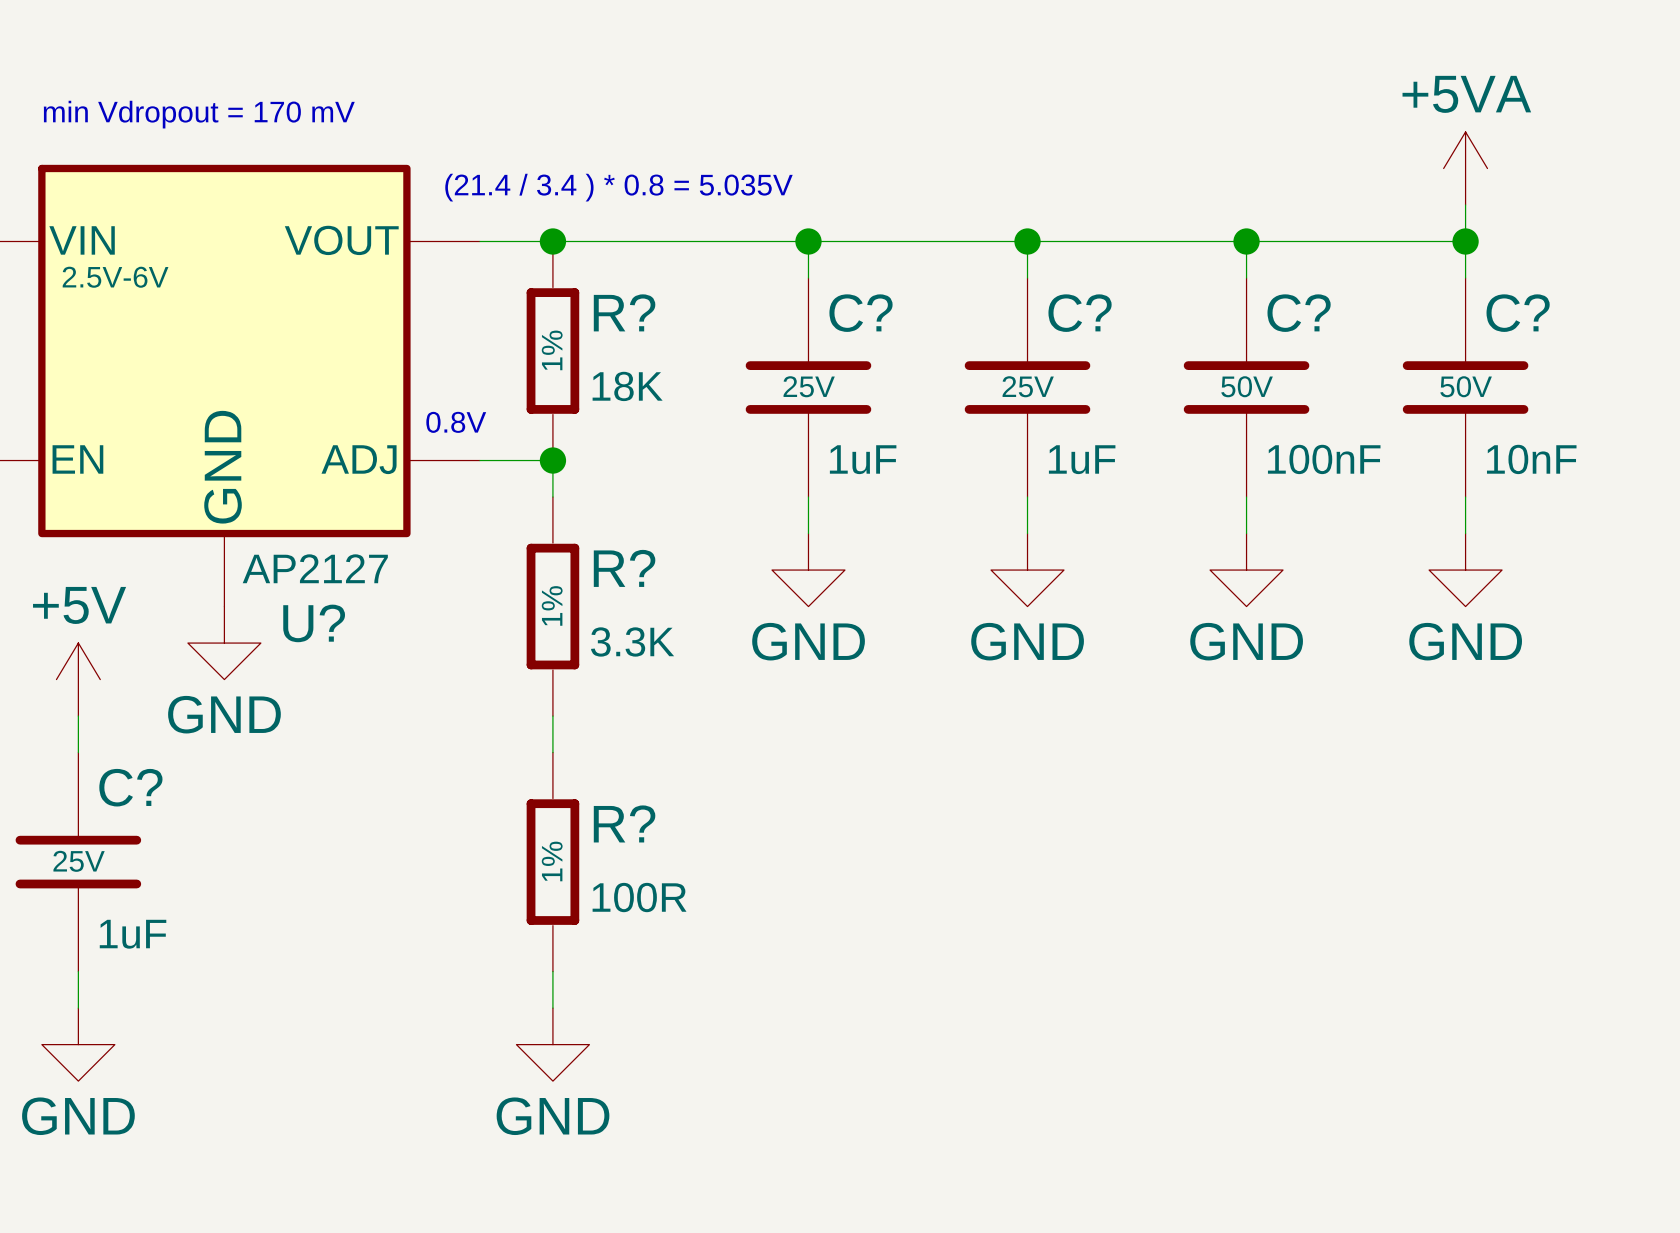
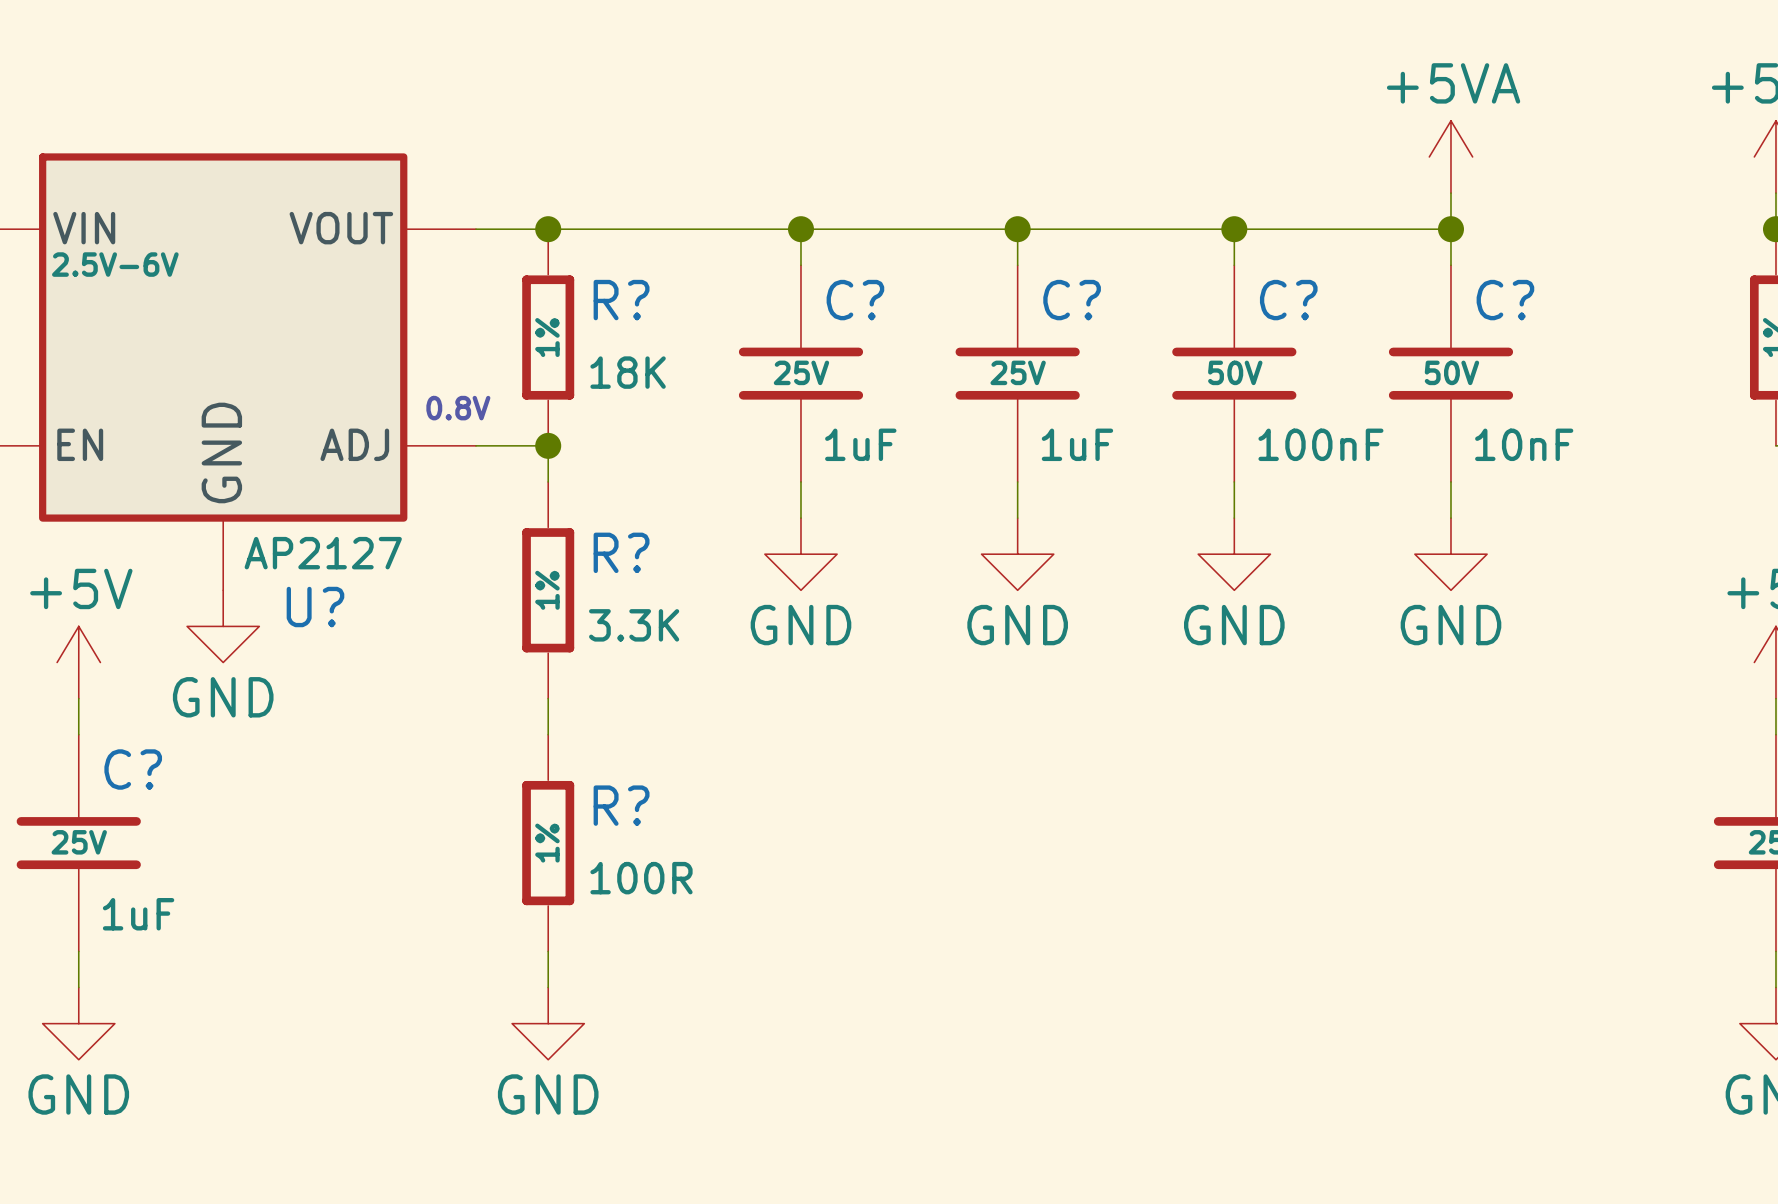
text: min Vdropout = 170 mV (199, 114) -> none
text: (21.4 / 3.4 ) * 0.8 = 5.035V (618, 187) -> none

